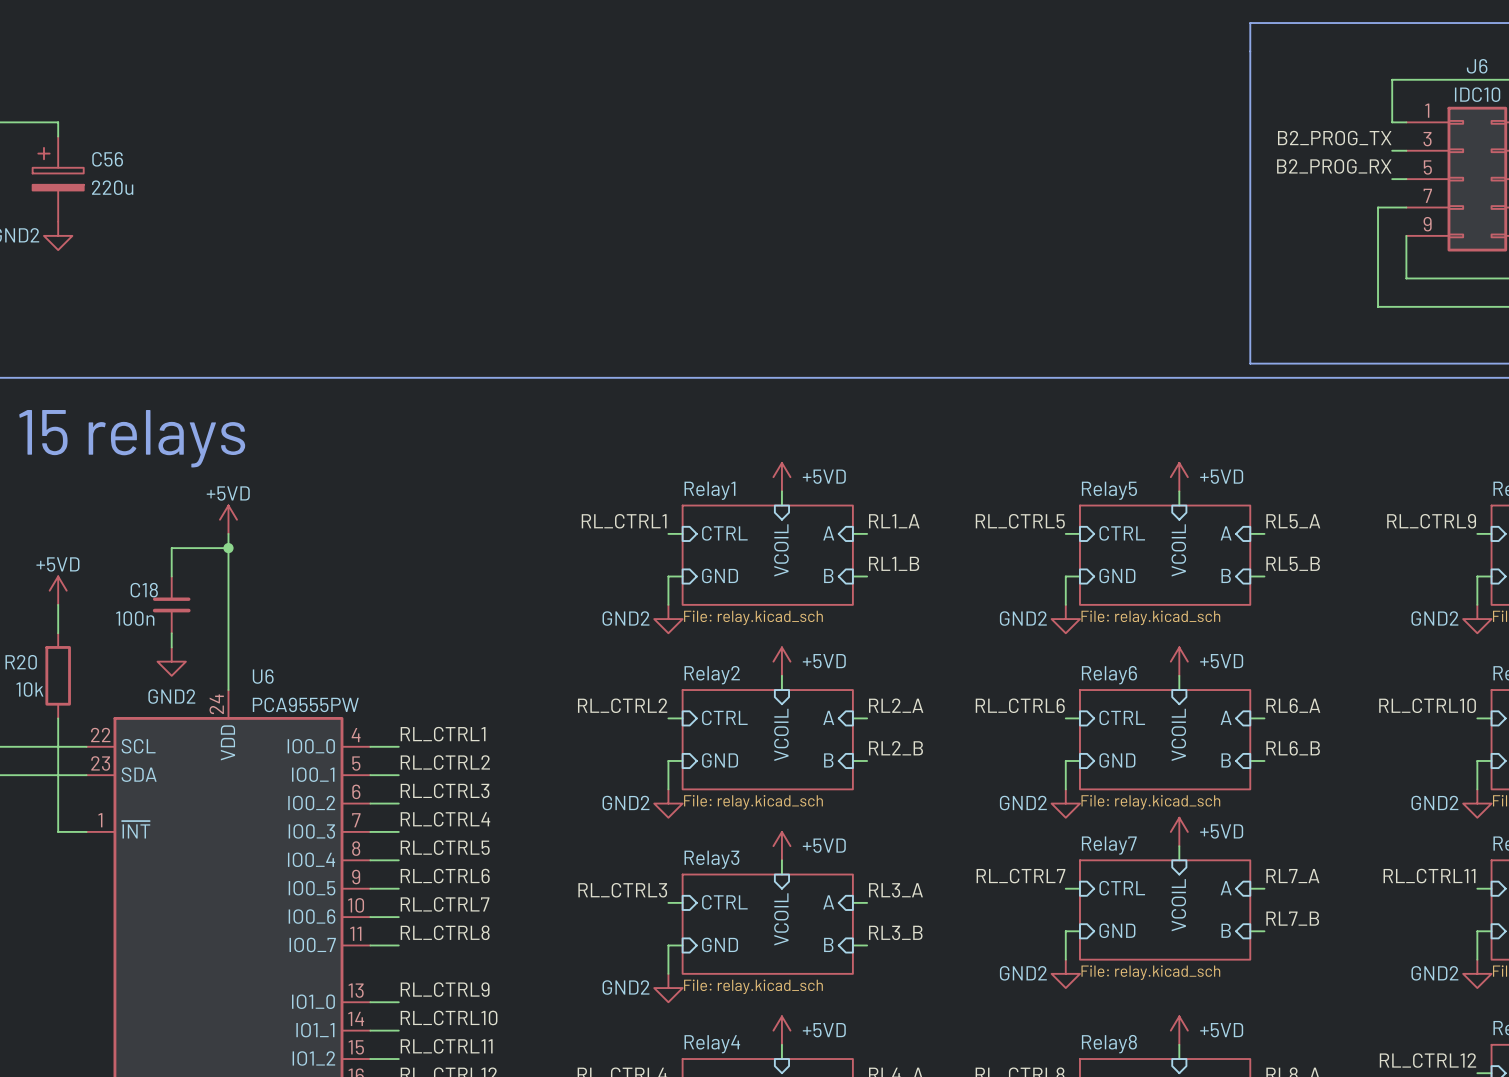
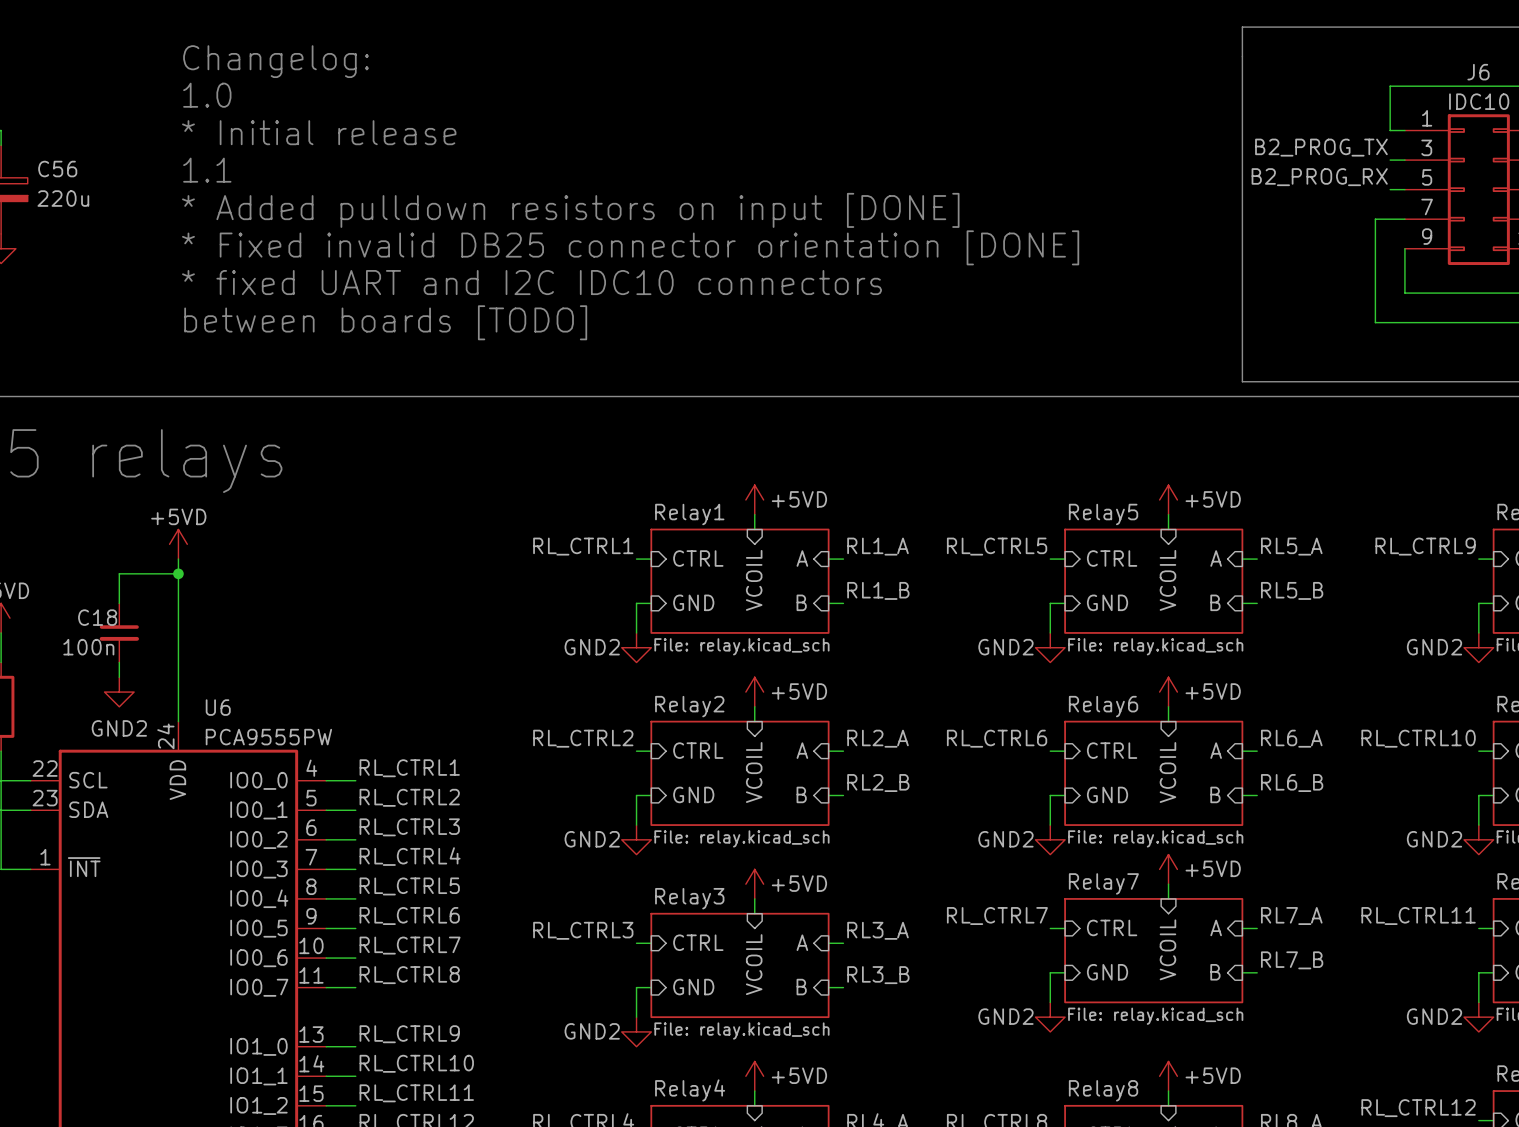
text: none -> Changelog: (276, 61)
text: none -> 1.0 (207, 95)
text: none -> * Initial release (319, 132)
text: none -> 1.1 (207, 170)
text: none -> * Added pulldown resistors on input [DONE] (570, 210)
text: none -> * Fixed invalid DB25 connector orientation [DONE] (630, 247)
text: none -> * fixed UART and I2C IDC10 connectors (531, 282)
text: none -> between boards [TODO] (385, 322)

